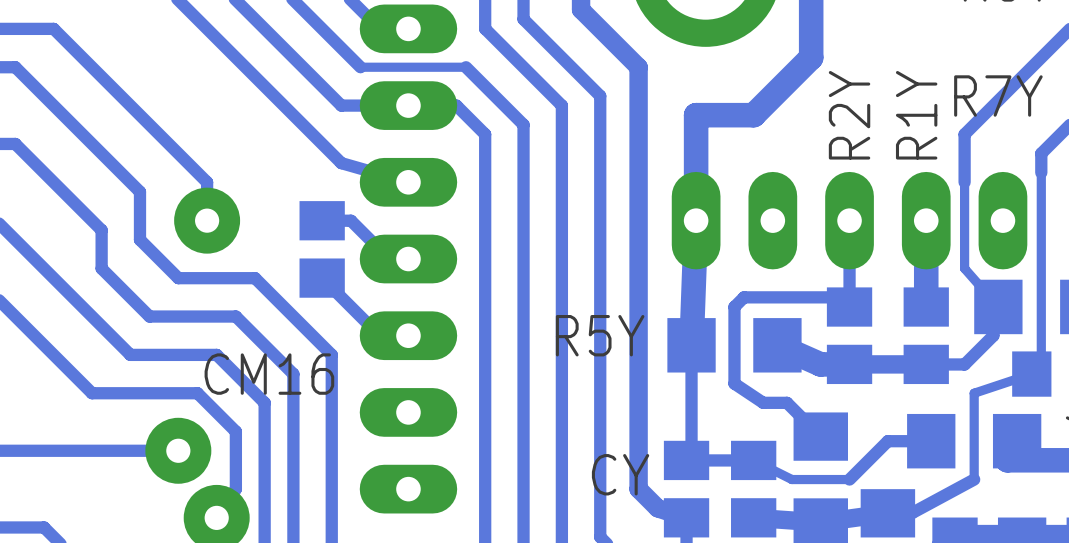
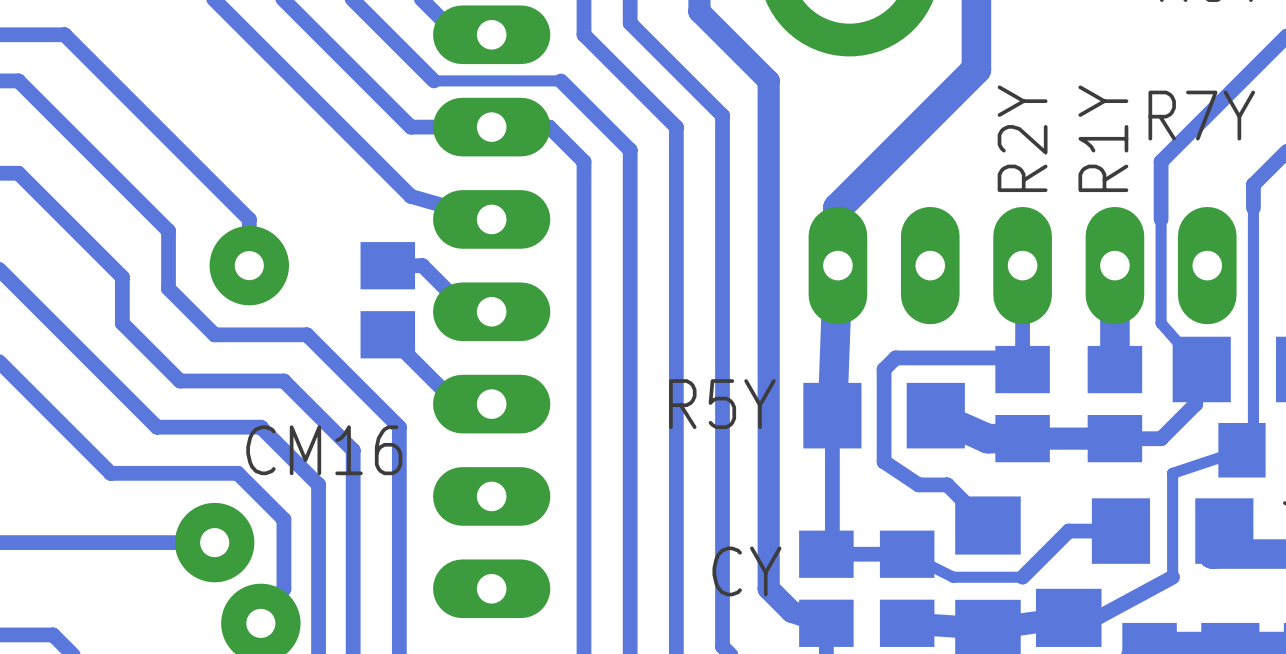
track: (753, 115) (696, 115) (696, 172) -> (907, 138) (837, 207)

